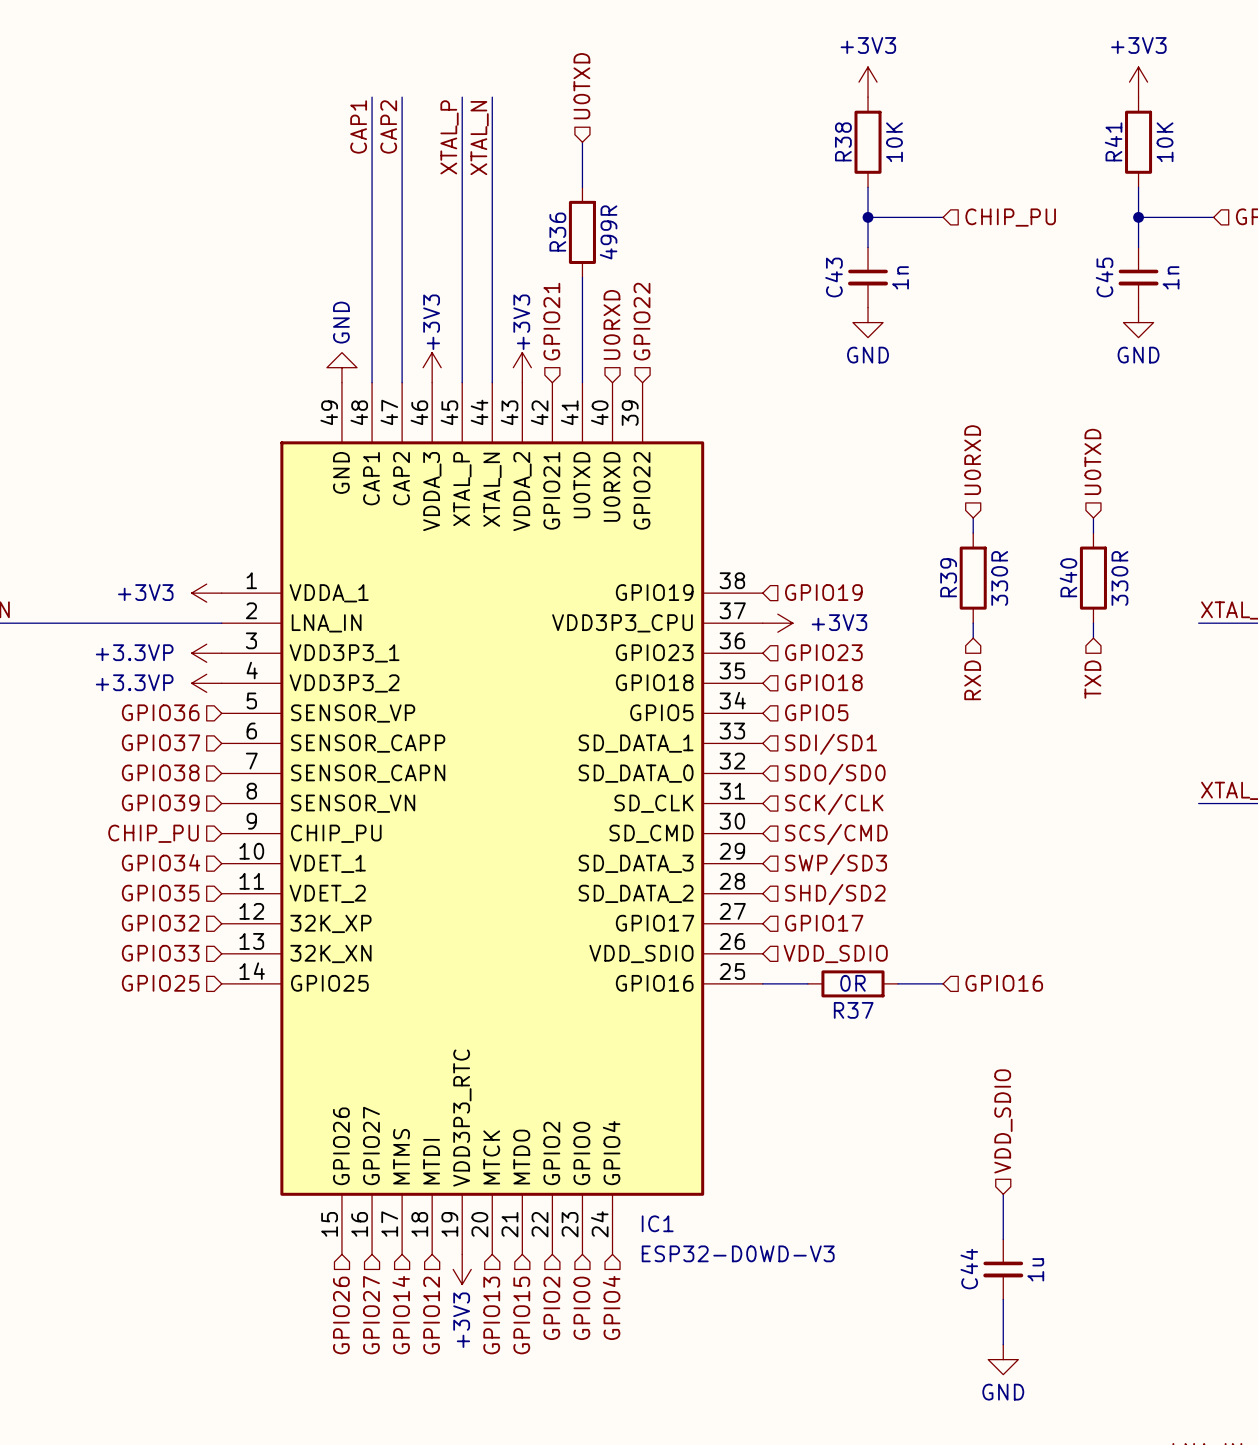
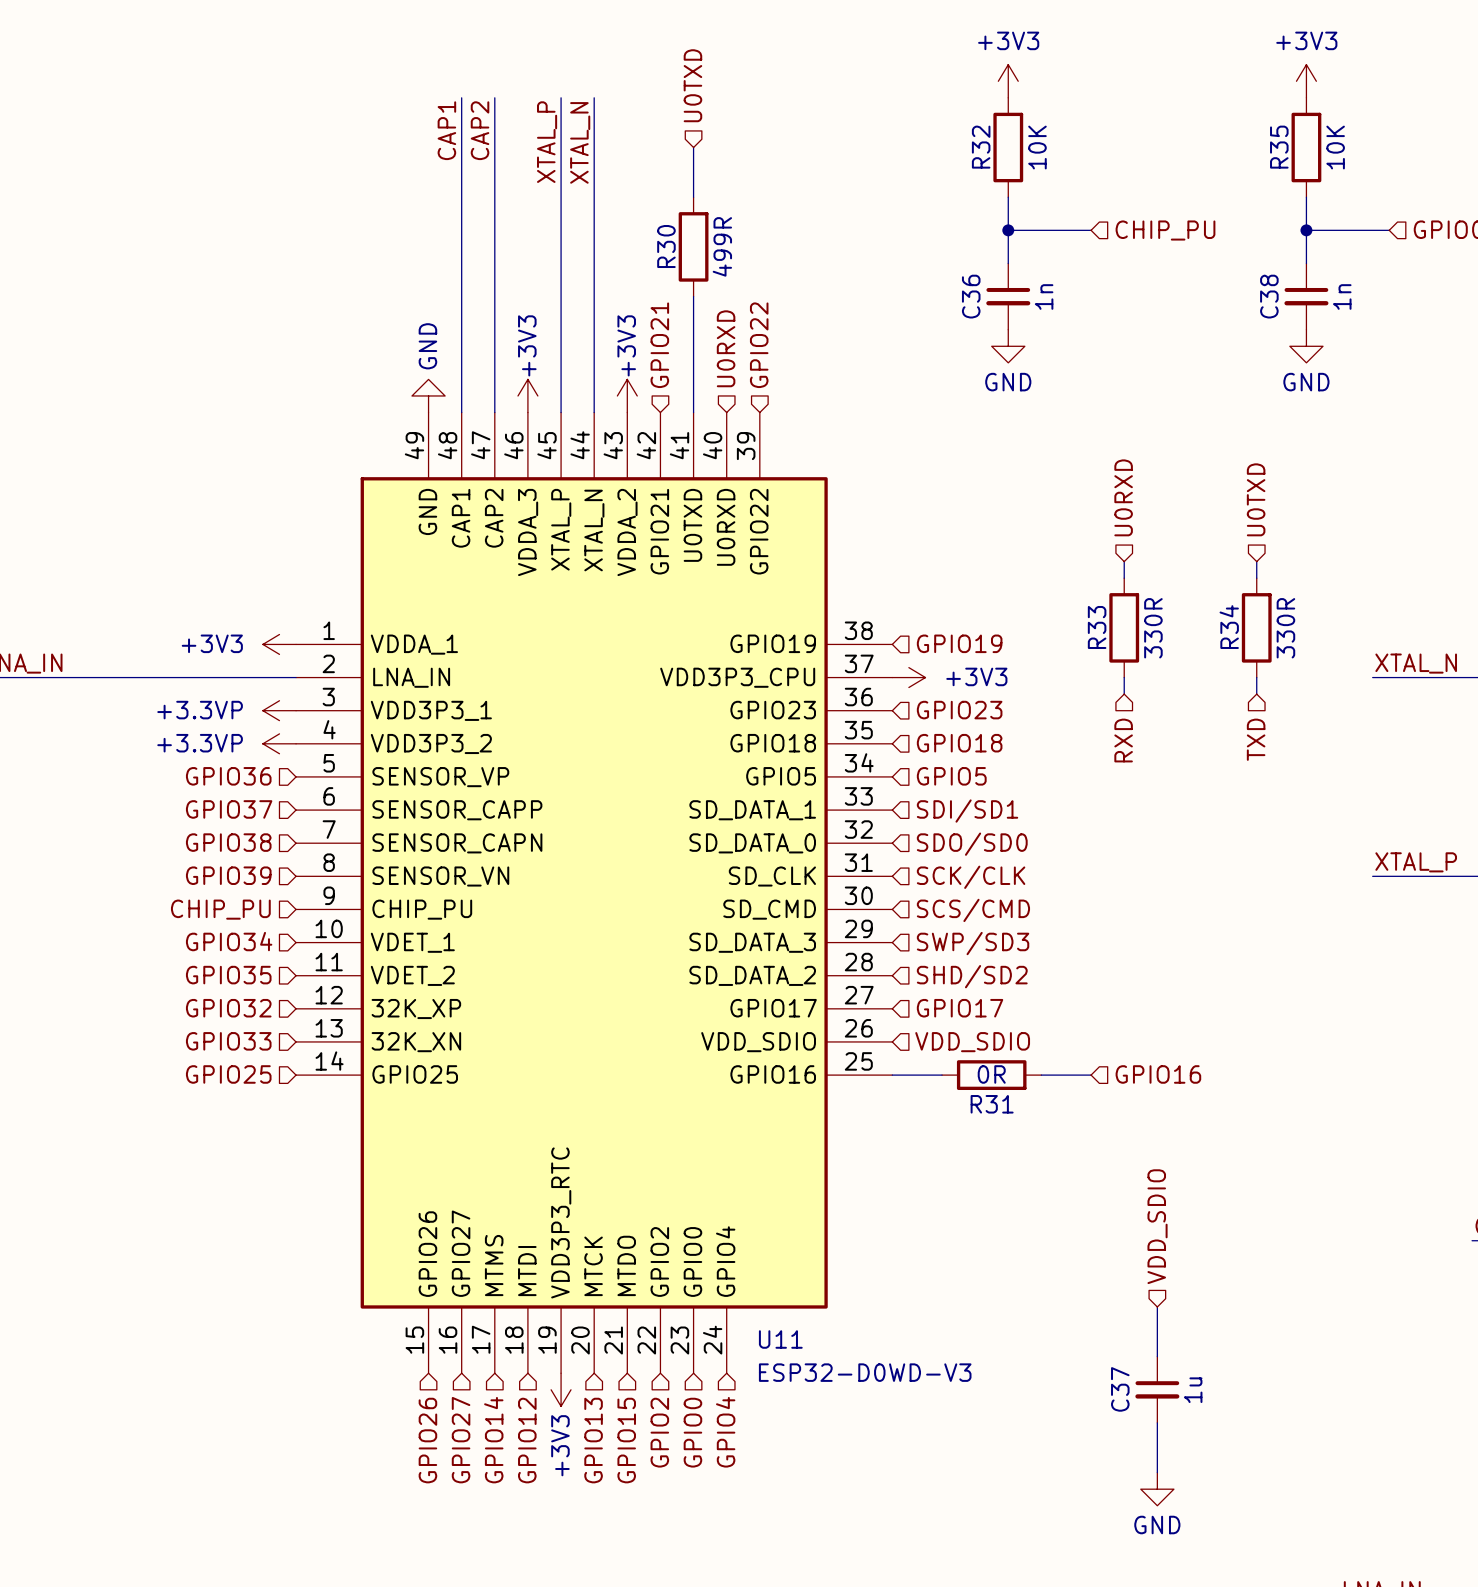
R38 name: R38 (843, 141) -> R32 (981, 147)
R41 name: R41 (1113, 141) -> R35 (1279, 147)
R36 name: R36 (557, 232) -> R30 (666, 246)
C43 name: C43 (834, 277) -> C36 (971, 296)
C45 name: C45 (1104, 277) -> C38 (1269, 296)
R39 name: R39 (948, 577) -> R33 (1097, 627)
R40 name: R40 (1068, 577) -> R34 (1229, 627)
R37 name: R37 (853, 1010) -> R31 (992, 1104)
IC1 name: IC1 (657, 1223) -> U11 (780, 1339)
C44 name: C44 (969, 1269) -> C37 (1120, 1389)

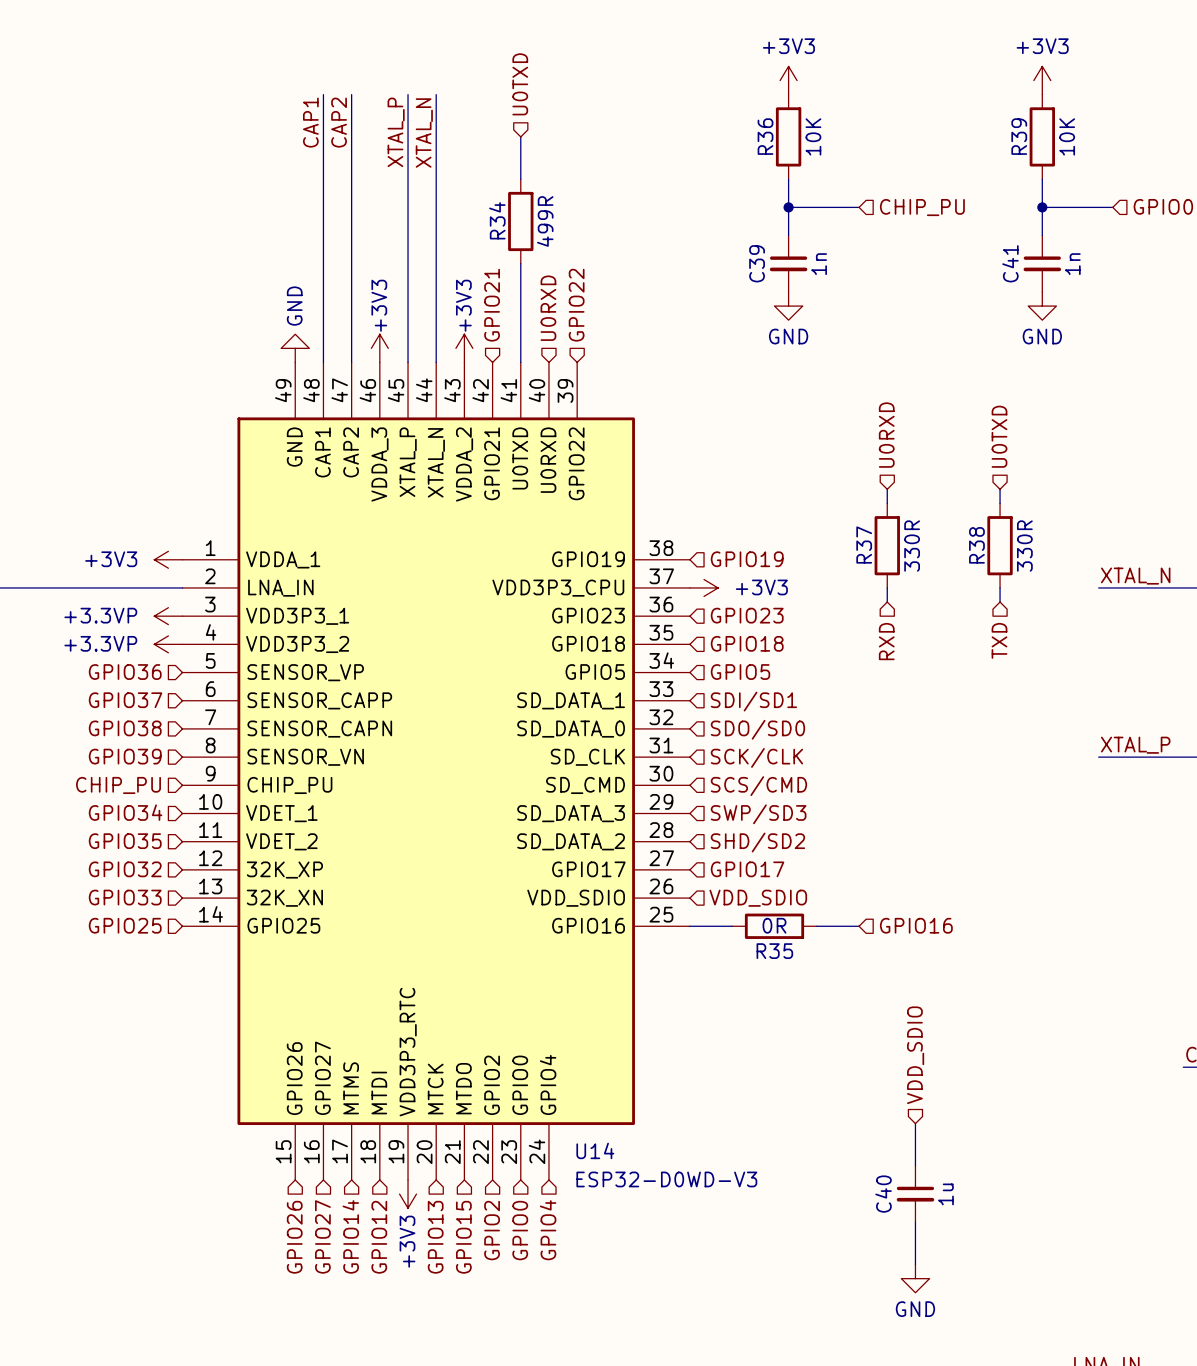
R32 name: R32 (981, 147) -> R36 (765, 136)
R35 name: R35 (1279, 147) -> R39 (1019, 136)
R30 name: R30 (666, 246) -> R34 (497, 220)
C36 name: C36 (971, 296) -> C39 (757, 263)
C38 name: C38 (1269, 296) -> C41 (1010, 263)
R33 name: R33 (1097, 627) -> R37 (864, 545)
R34 name: R34 (1229, 627) -> R38 (976, 545)
R31 name: R31 (992, 1104) -> R35 (774, 951)
U11 name: U11 (780, 1339) -> U14 (595, 1150)
C37 name: C37 (1120, 1389) -> C40 (883, 1194)

